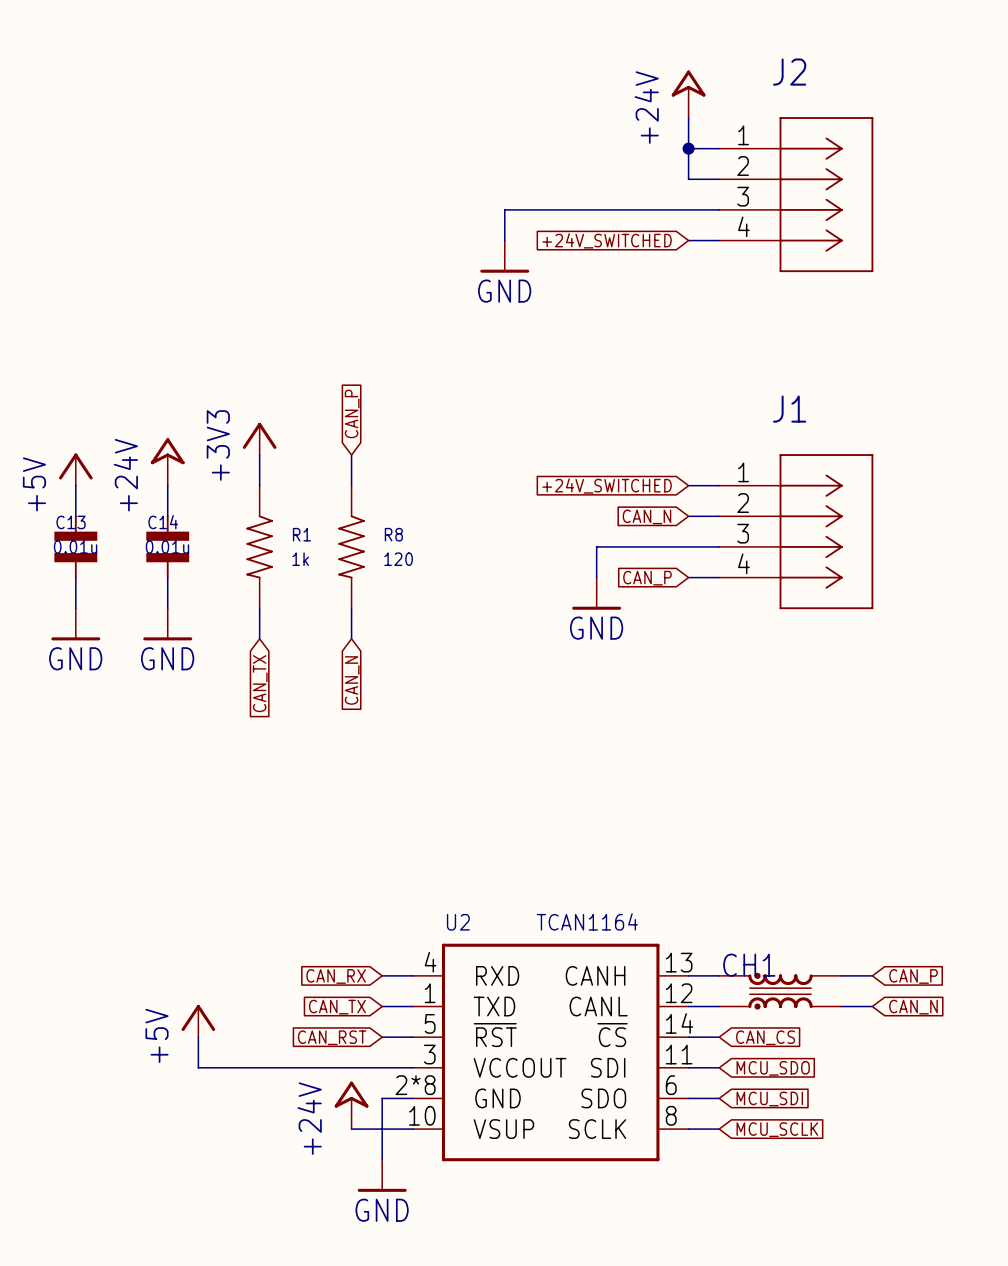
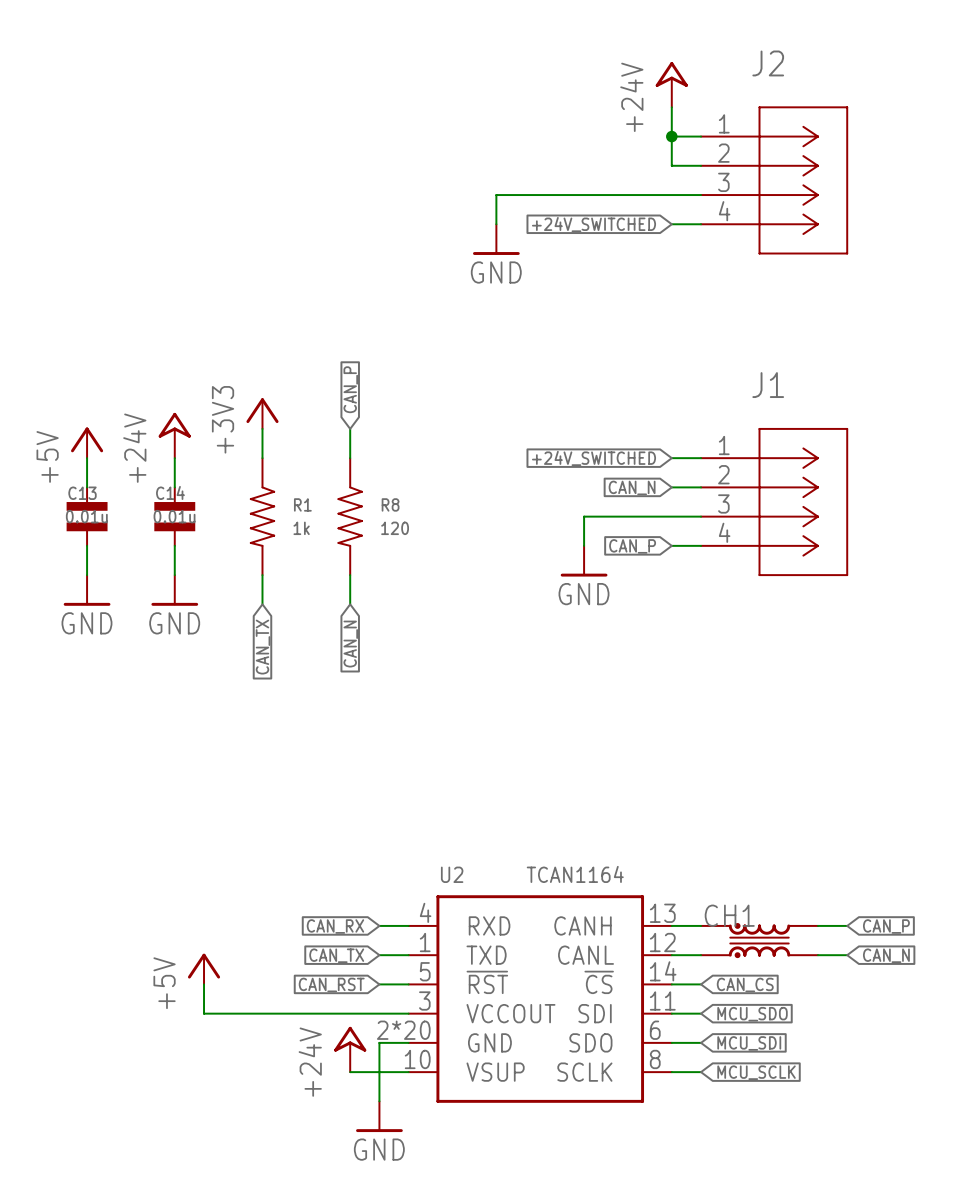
U2 pin number: 2*8 (415, 1085) -> 2*20 (403, 1030)

